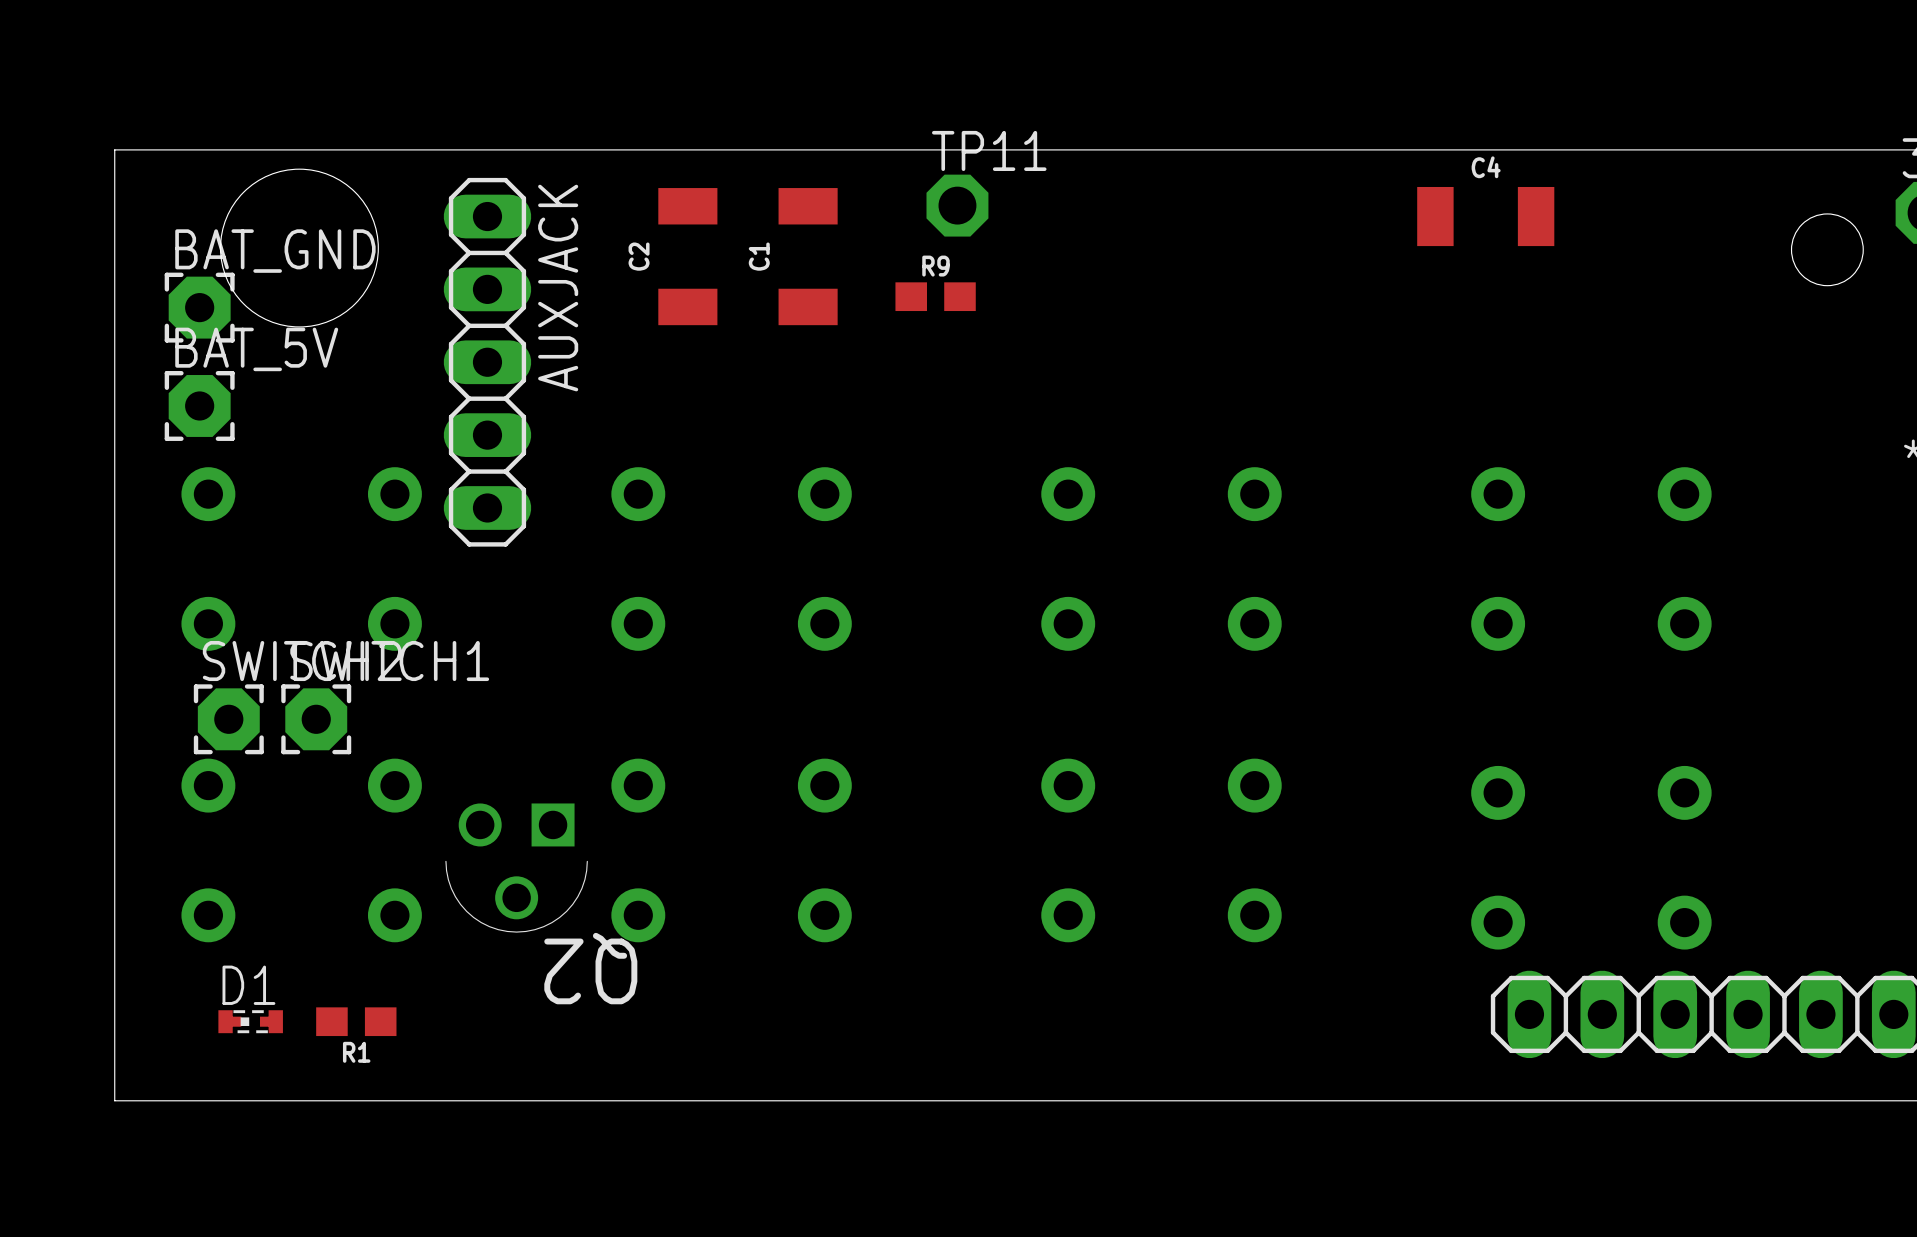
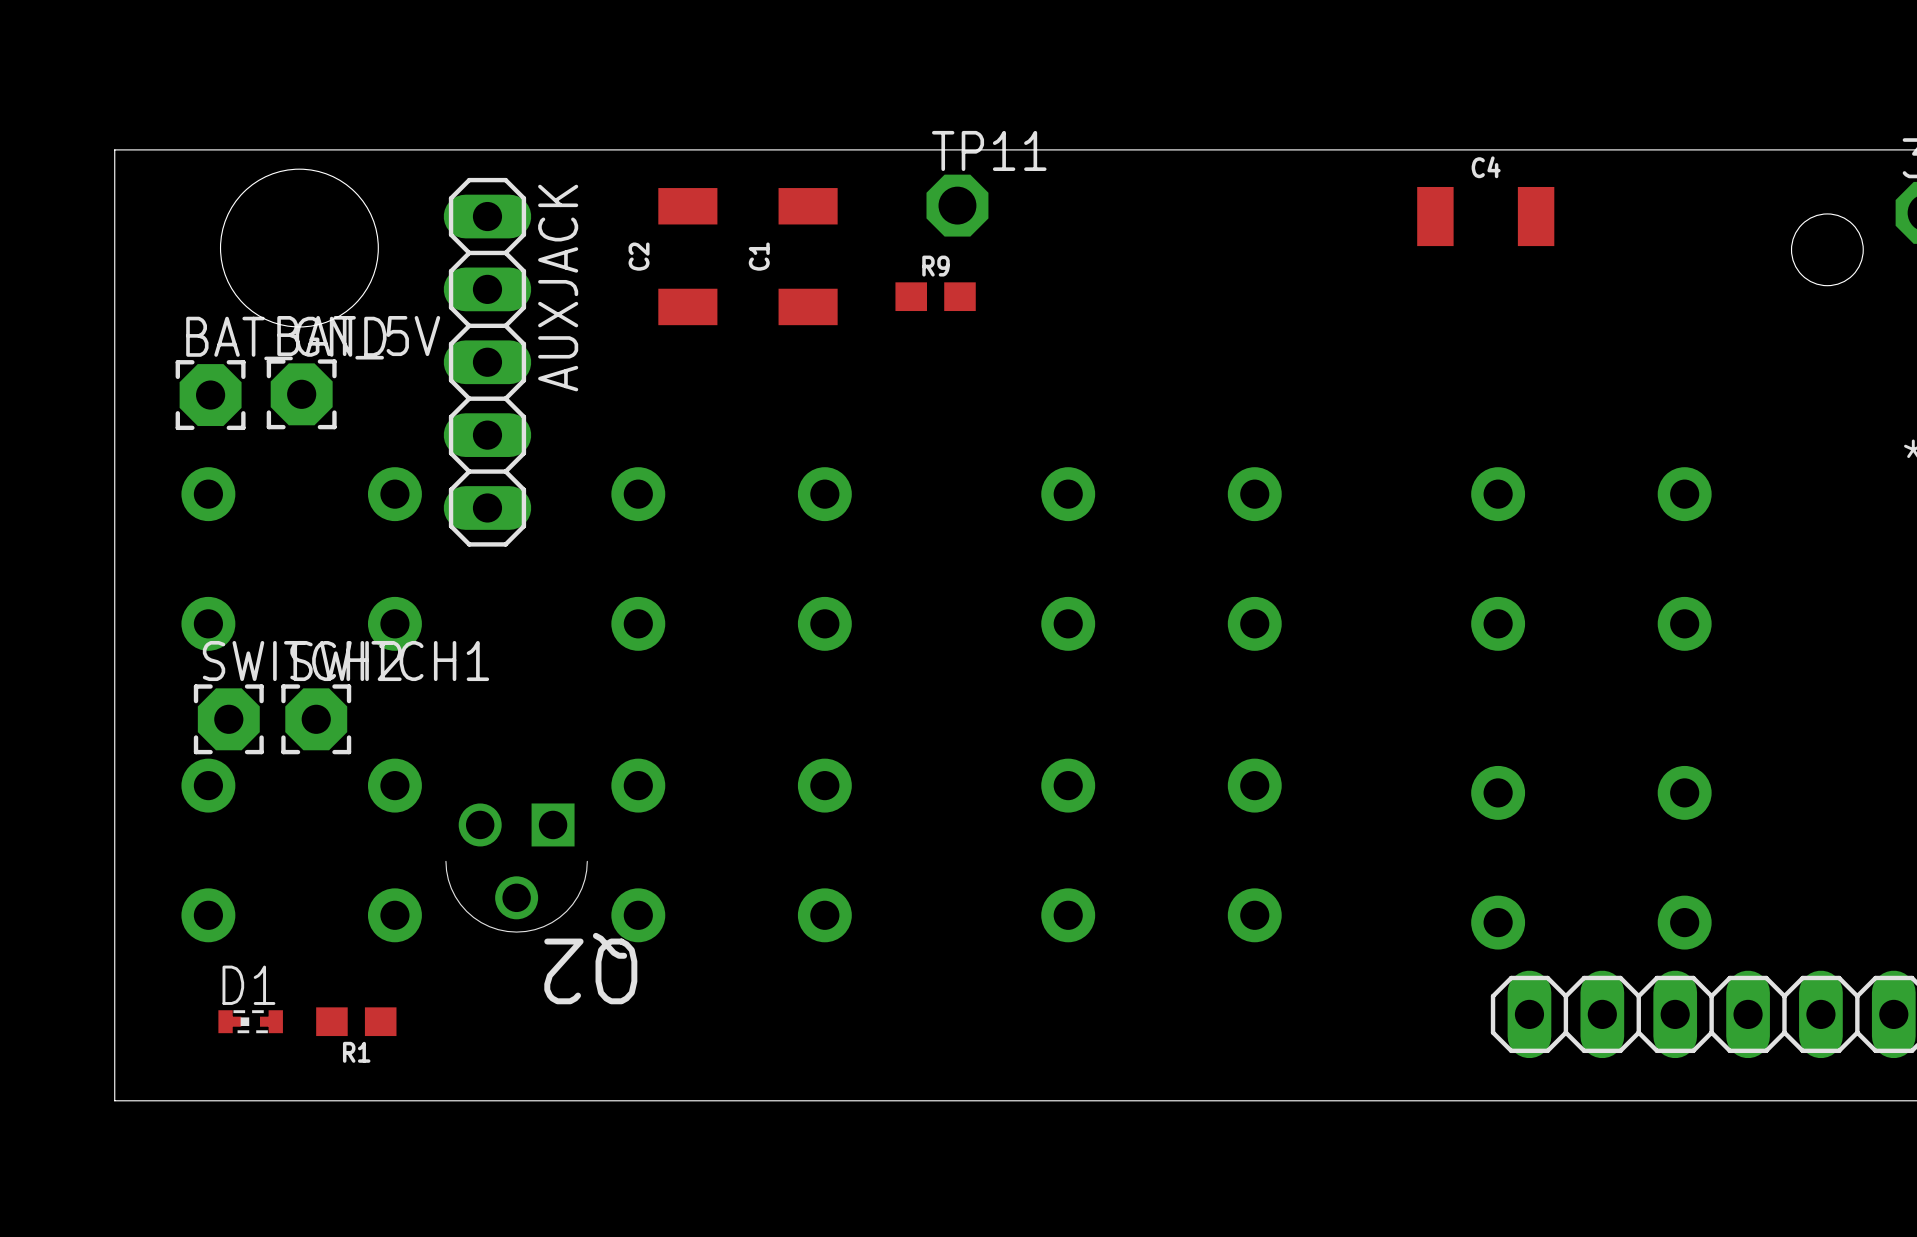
BAT_GND position: (199, 307) -> (210, 395)
BAT_5V position: (199, 405) -> (301, 394)

